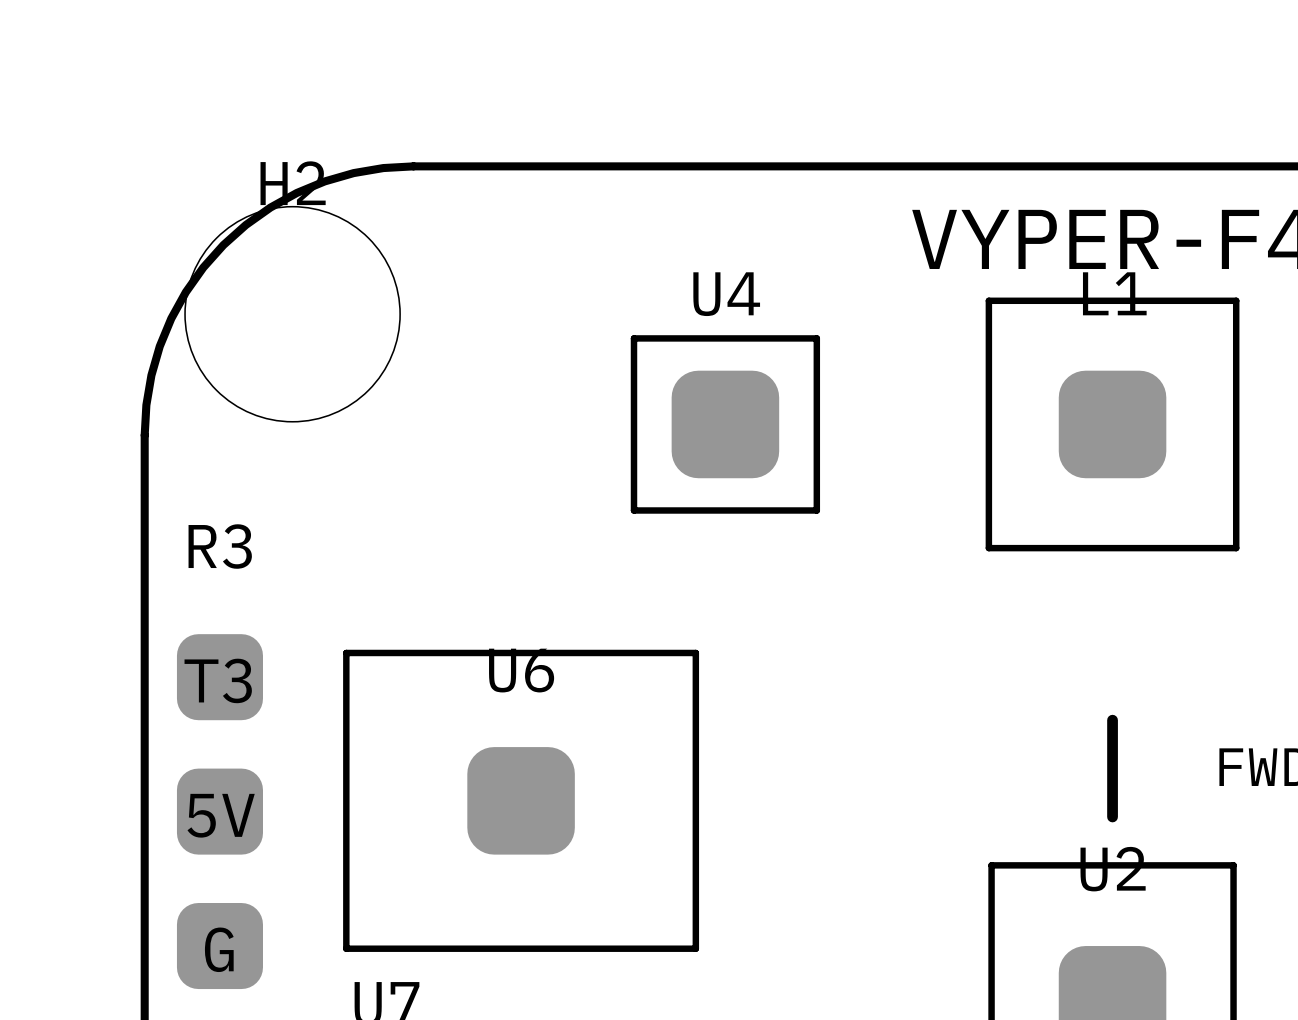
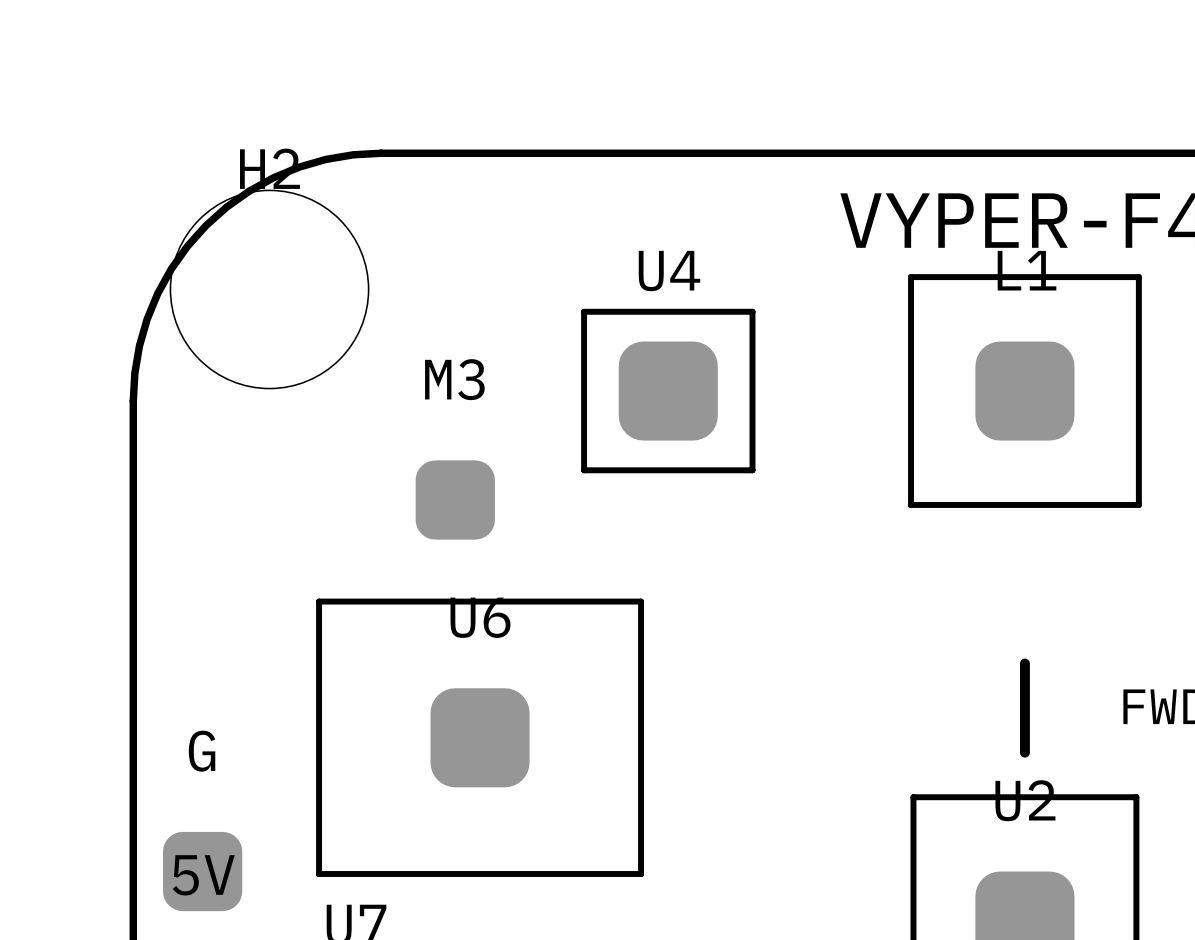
M3: none -> (455, 500)
R3: (219, 677) -> none
T3: (219, 811) -> none
5V name: 5V (221, 815) -> G (202, 751)
G name: G (219, 949) -> 5V (203, 875)

